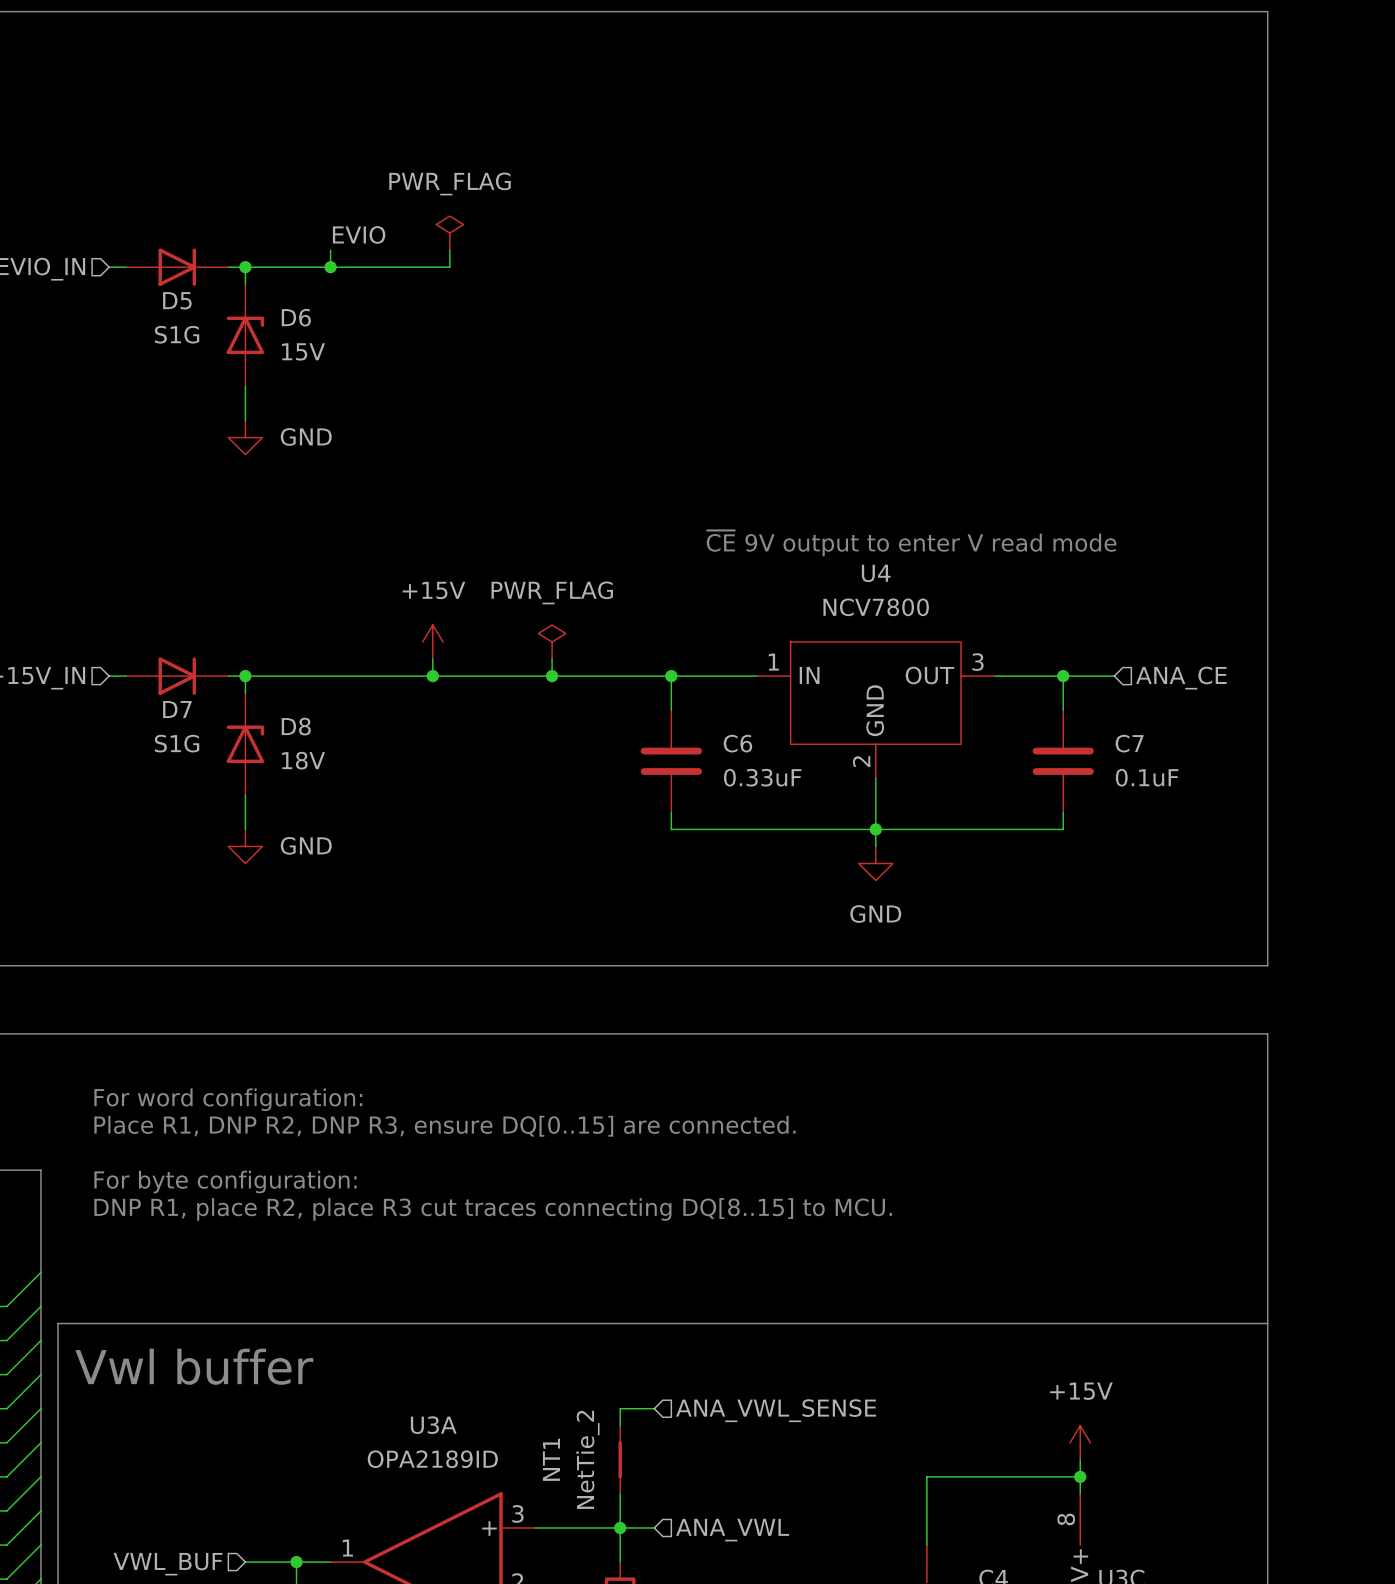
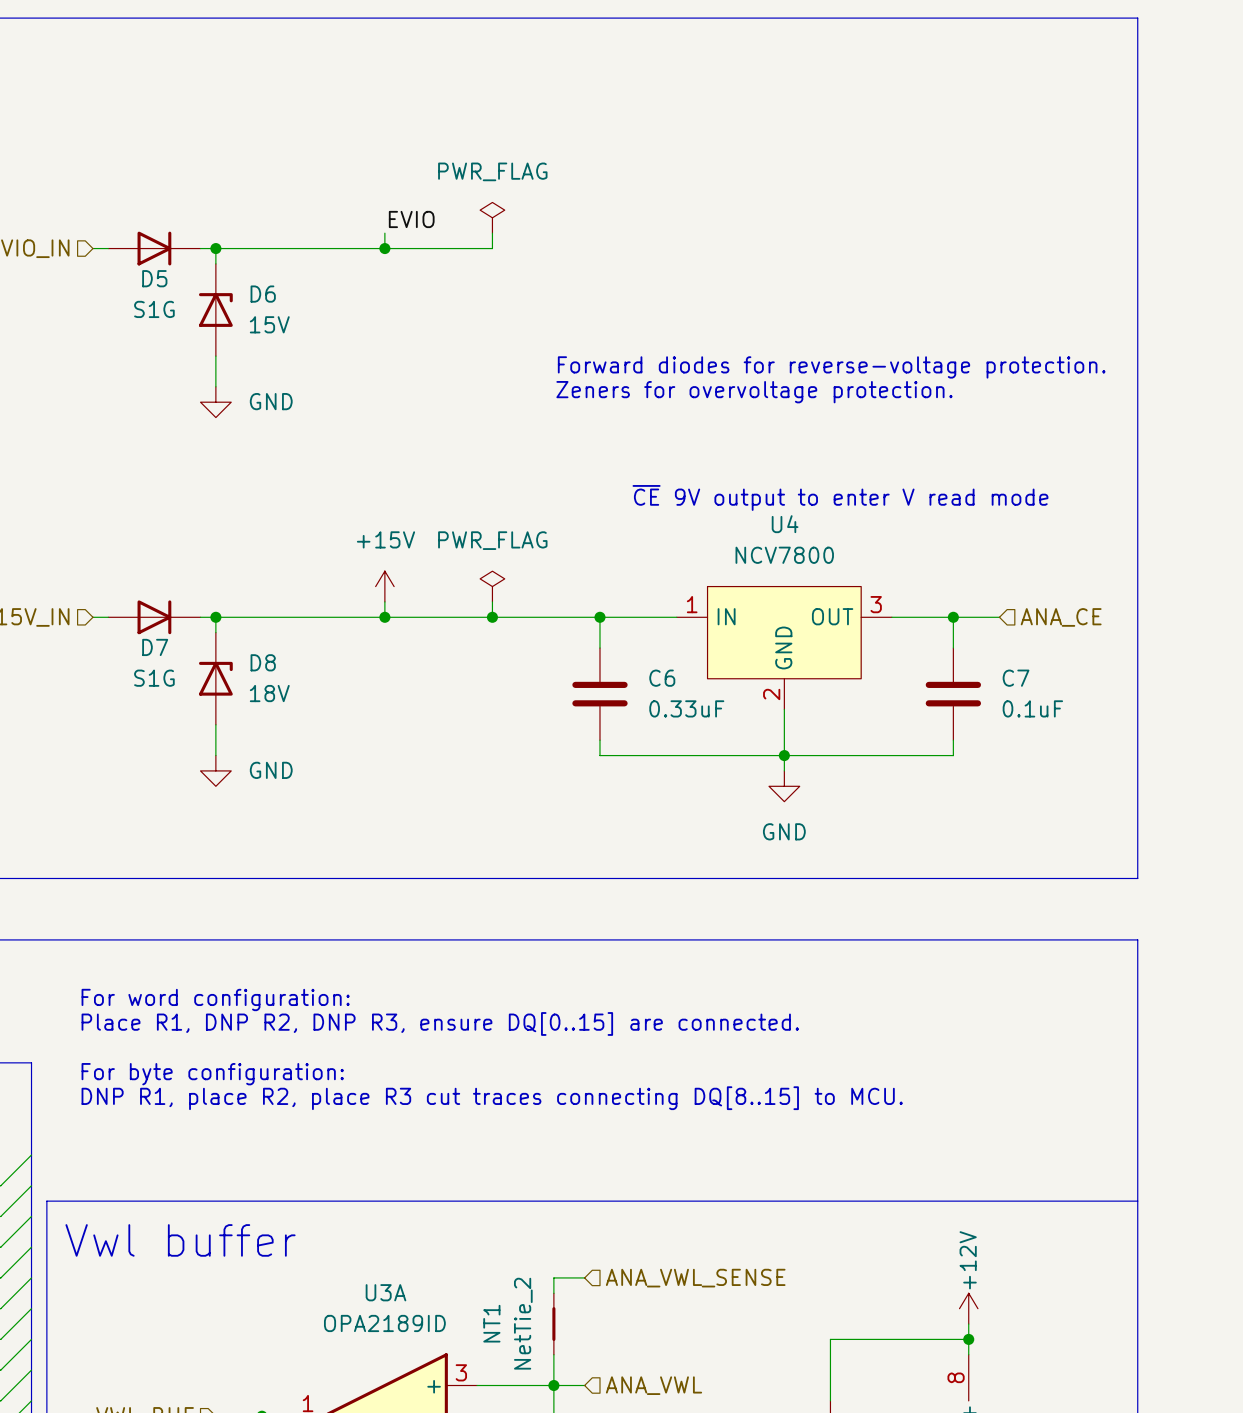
power symbol position: PWR_FLAG (449, 233) -> PWR_FLAG (492, 217)
label position: EVIO (359, 234) -> EVIO (411, 219)
wire: (330, 250) (330, 267) -> (384, 233) (384, 248)
wire: (449, 250) (449, 267) -> (492, 233) (492, 248) (400, 248)
junction: (330, 267) -> none
junction: none -> (384, 248)
text: none -> Forward diodes for reverse-voltage protection. (831, 367)
text: none -> Zeners for overvoltage protection. (754, 392)
power symbol: +15V (1080, 1442) -> +12V (968, 1308)

